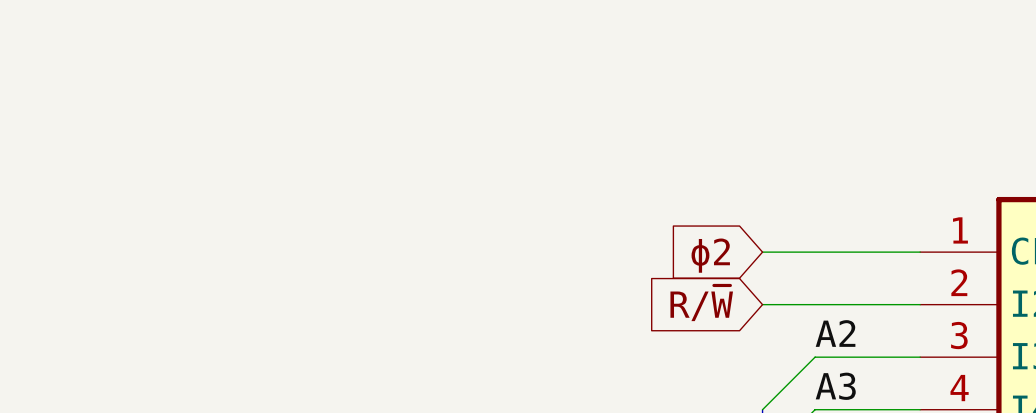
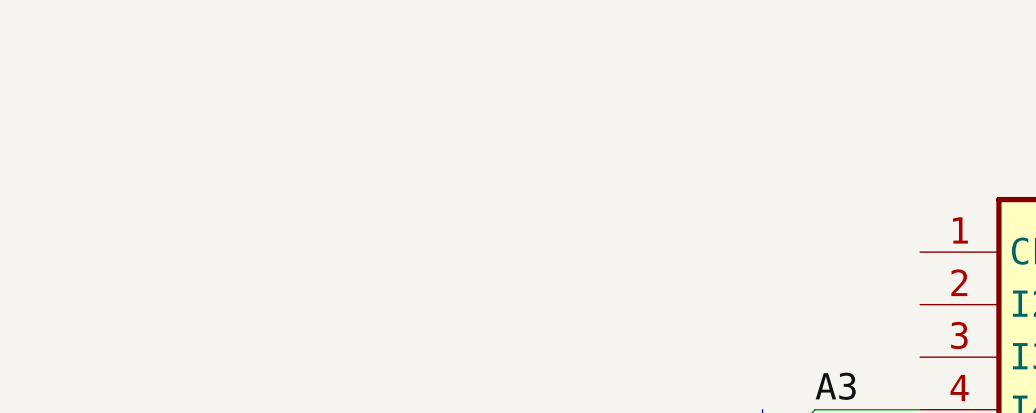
wire: (762, 252) (920, 252) -> none
global label: ϕ2 (710, 255) -> none
global label: R/~{W} (701, 303) -> none
wire: (762, 304) (920, 304) -> none
label: A2 (835, 333) -> none
wire: (920, 357) (815, 357) (762, 409) -> none

